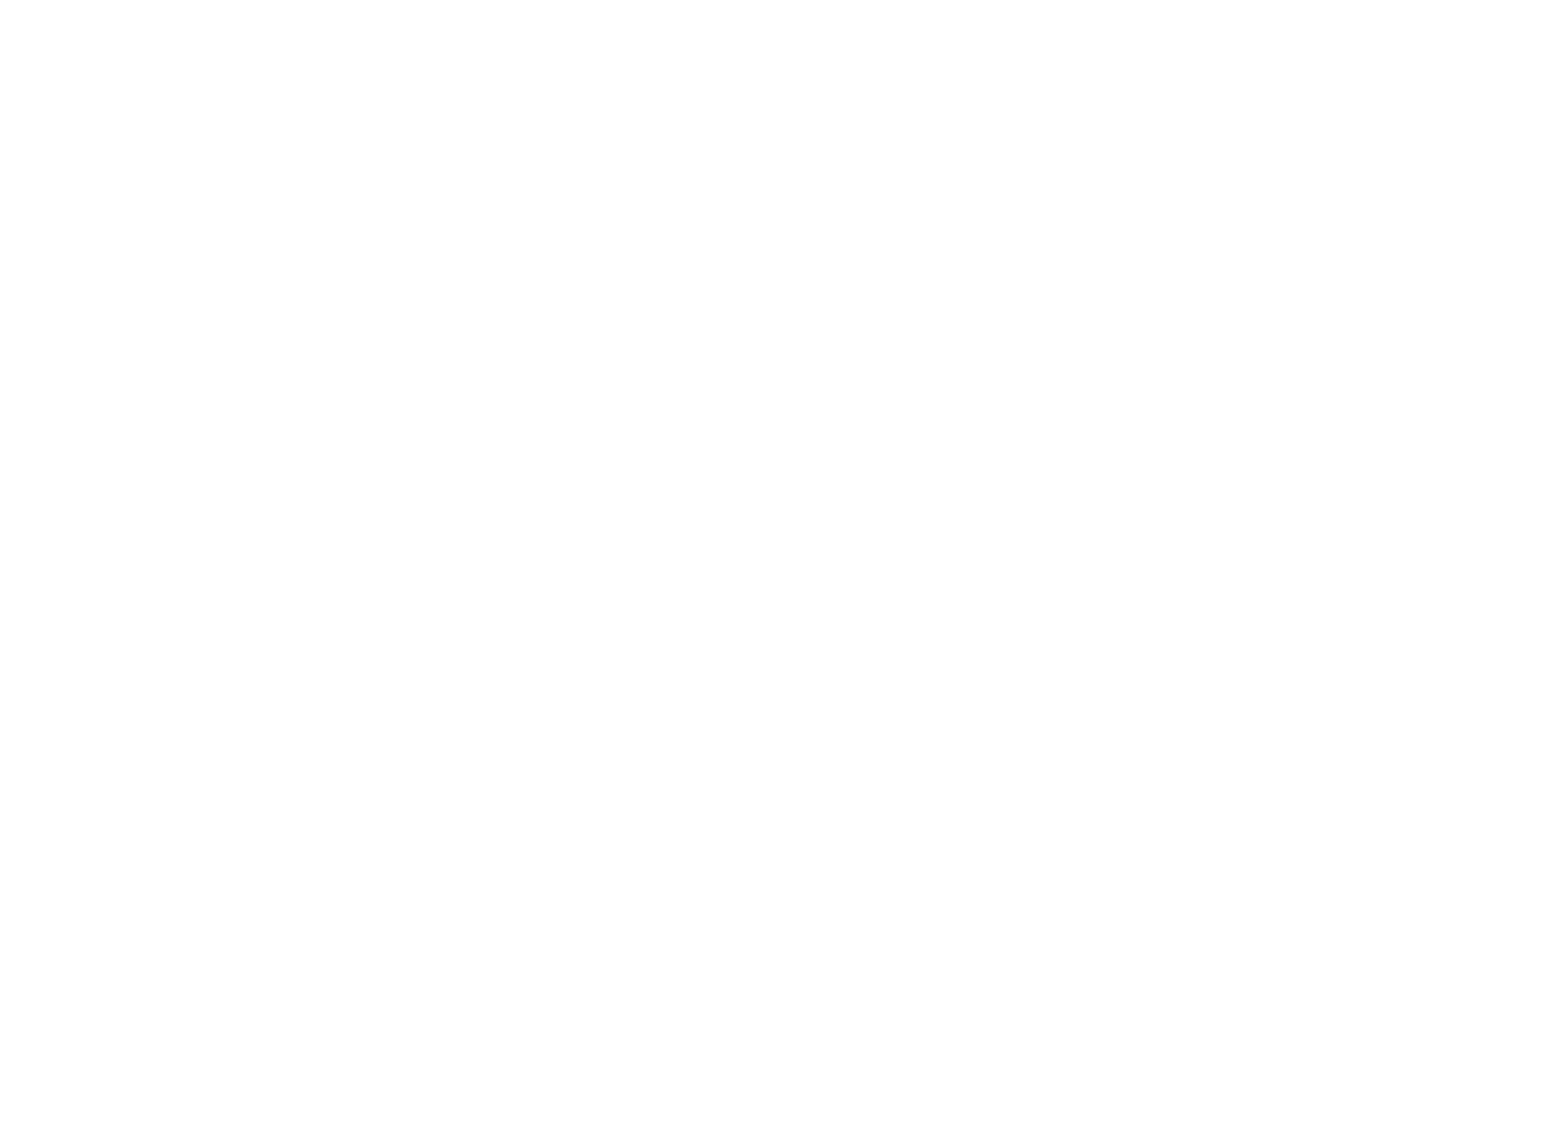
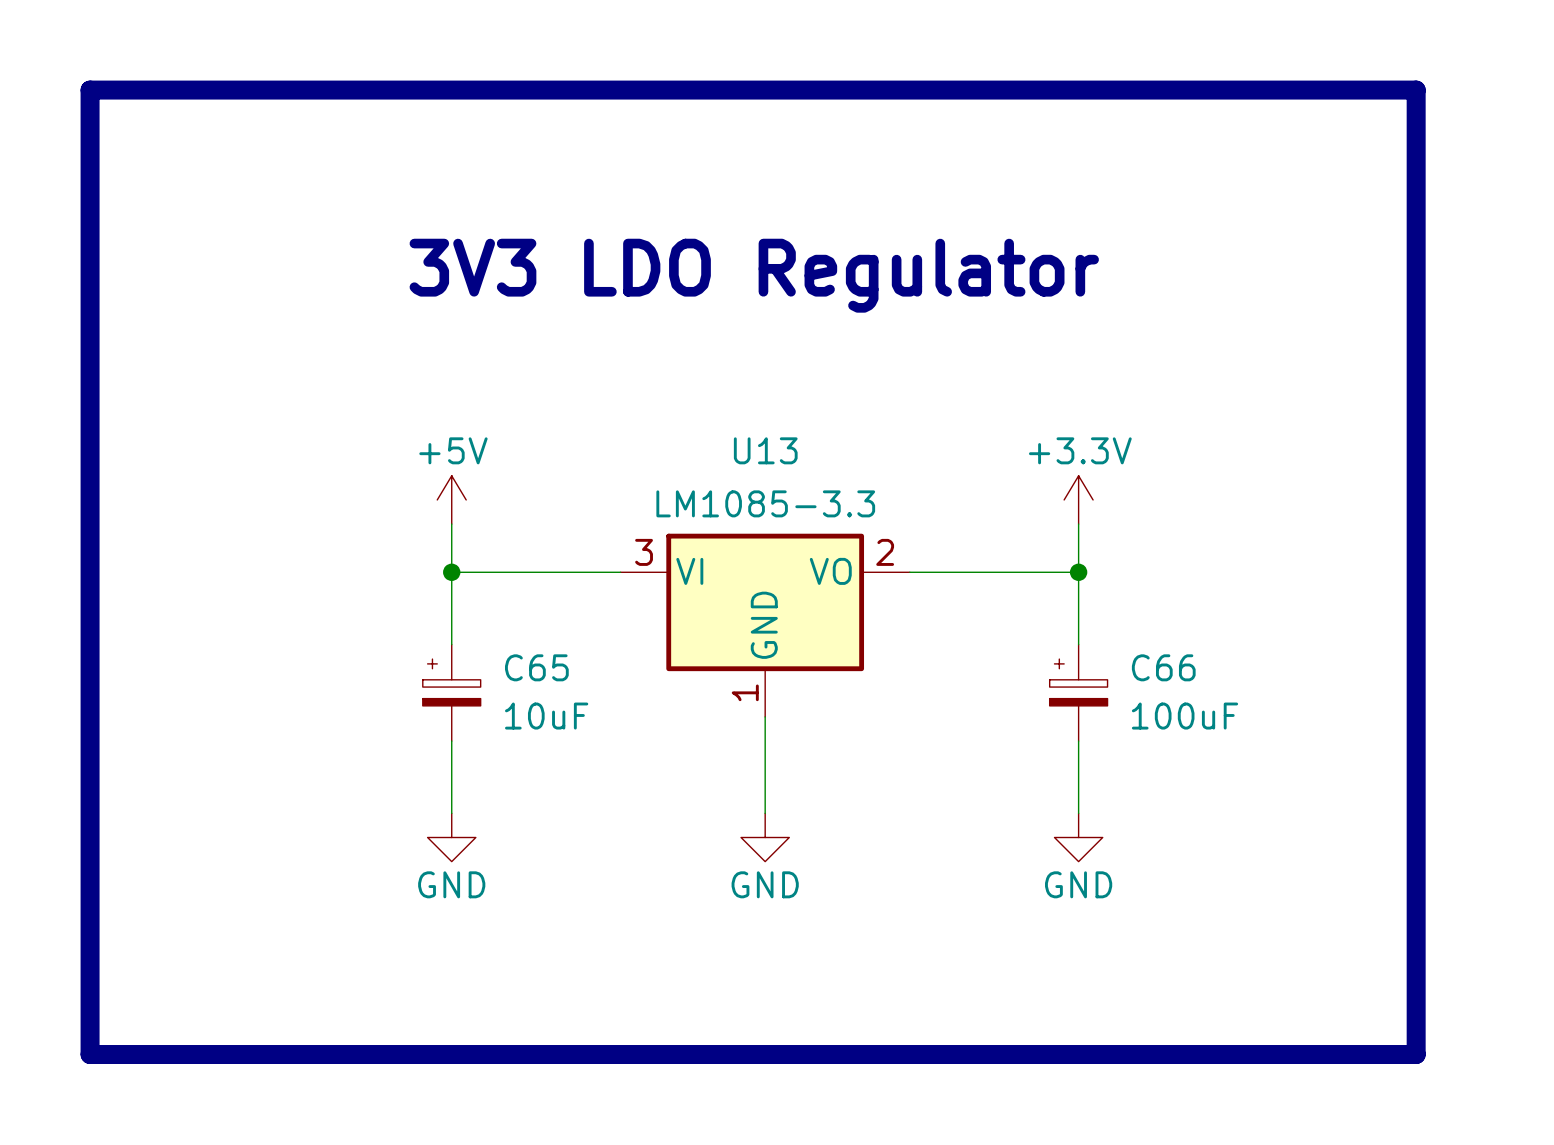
line: none -> (90, 90) (1416, 90) (1416, 1054) (90, 1054) (90, 90)
text: none -> 3V3 LDO Regulator (754, 275)
power symbol: none -> +5V (451, 499)
power symbol: none -> +3.3V (1078, 499)
wire: none -> (451, 524) (451, 644)
wire: none -> (1078, 524) (1078, 644)
wire: none -> (451, 572) (620, 572)
junction: none -> (451, 572)
wire: none -> (909, 572) (1078, 572)
junction: none -> (1078, 572)
U13: none -> (765, 625)
C65: none -> 10uF (451, 692)
C66: none -> 100uF (1078, 692)
wire: none -> (765, 716) (765, 813)
wire: none -> (451, 741) (451, 813)
wire: none -> (1078, 741) (1078, 813)
power symbol: none -> GND (451, 837)
power symbol: none -> GND (765, 837)
power symbol: none -> GND (1078, 837)

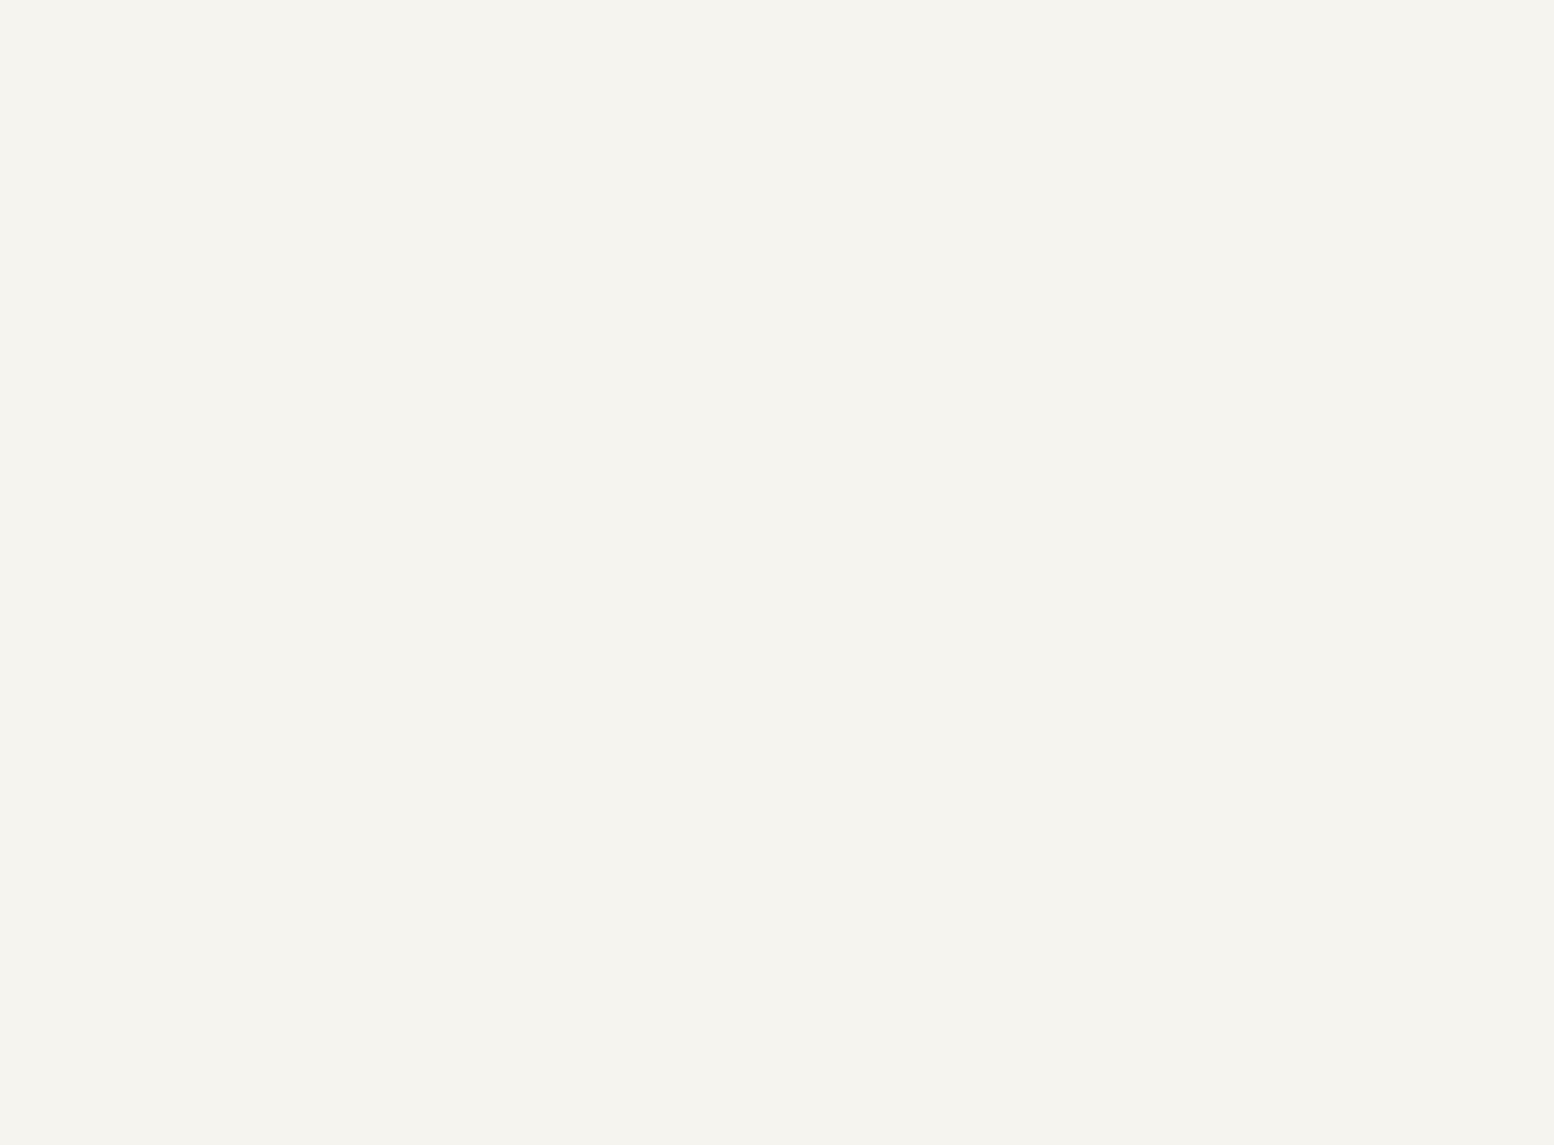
line: (90, 90) (1416, 90) (1416, 1054) (90, 1054) (90, 90) -> none
text: 3V3 LDO Regulator (754, 275) -> none
power symbol: +5V (451, 499) -> none
power symbol: +3.3V (1078, 499) -> none
wire: (451, 524) (451, 644) -> none
wire: (1078, 524) (1078, 644) -> none
wire: (451, 572) (620, 572) -> none
junction: (451, 572) -> none
wire: (909, 572) (1078, 572) -> none
junction: (1078, 572) -> none
U13: (765, 625) -> none
C65: 10uF (451, 692) -> none
C66: 100uF (1078, 692) -> none
wire: (765, 716) (765, 813) -> none
wire: (451, 741) (451, 813) -> none
wire: (1078, 741) (1078, 813) -> none
power symbol: GND (451, 837) -> none
power symbol: GND (765, 837) -> none
power symbol: GND (1078, 837) -> none

